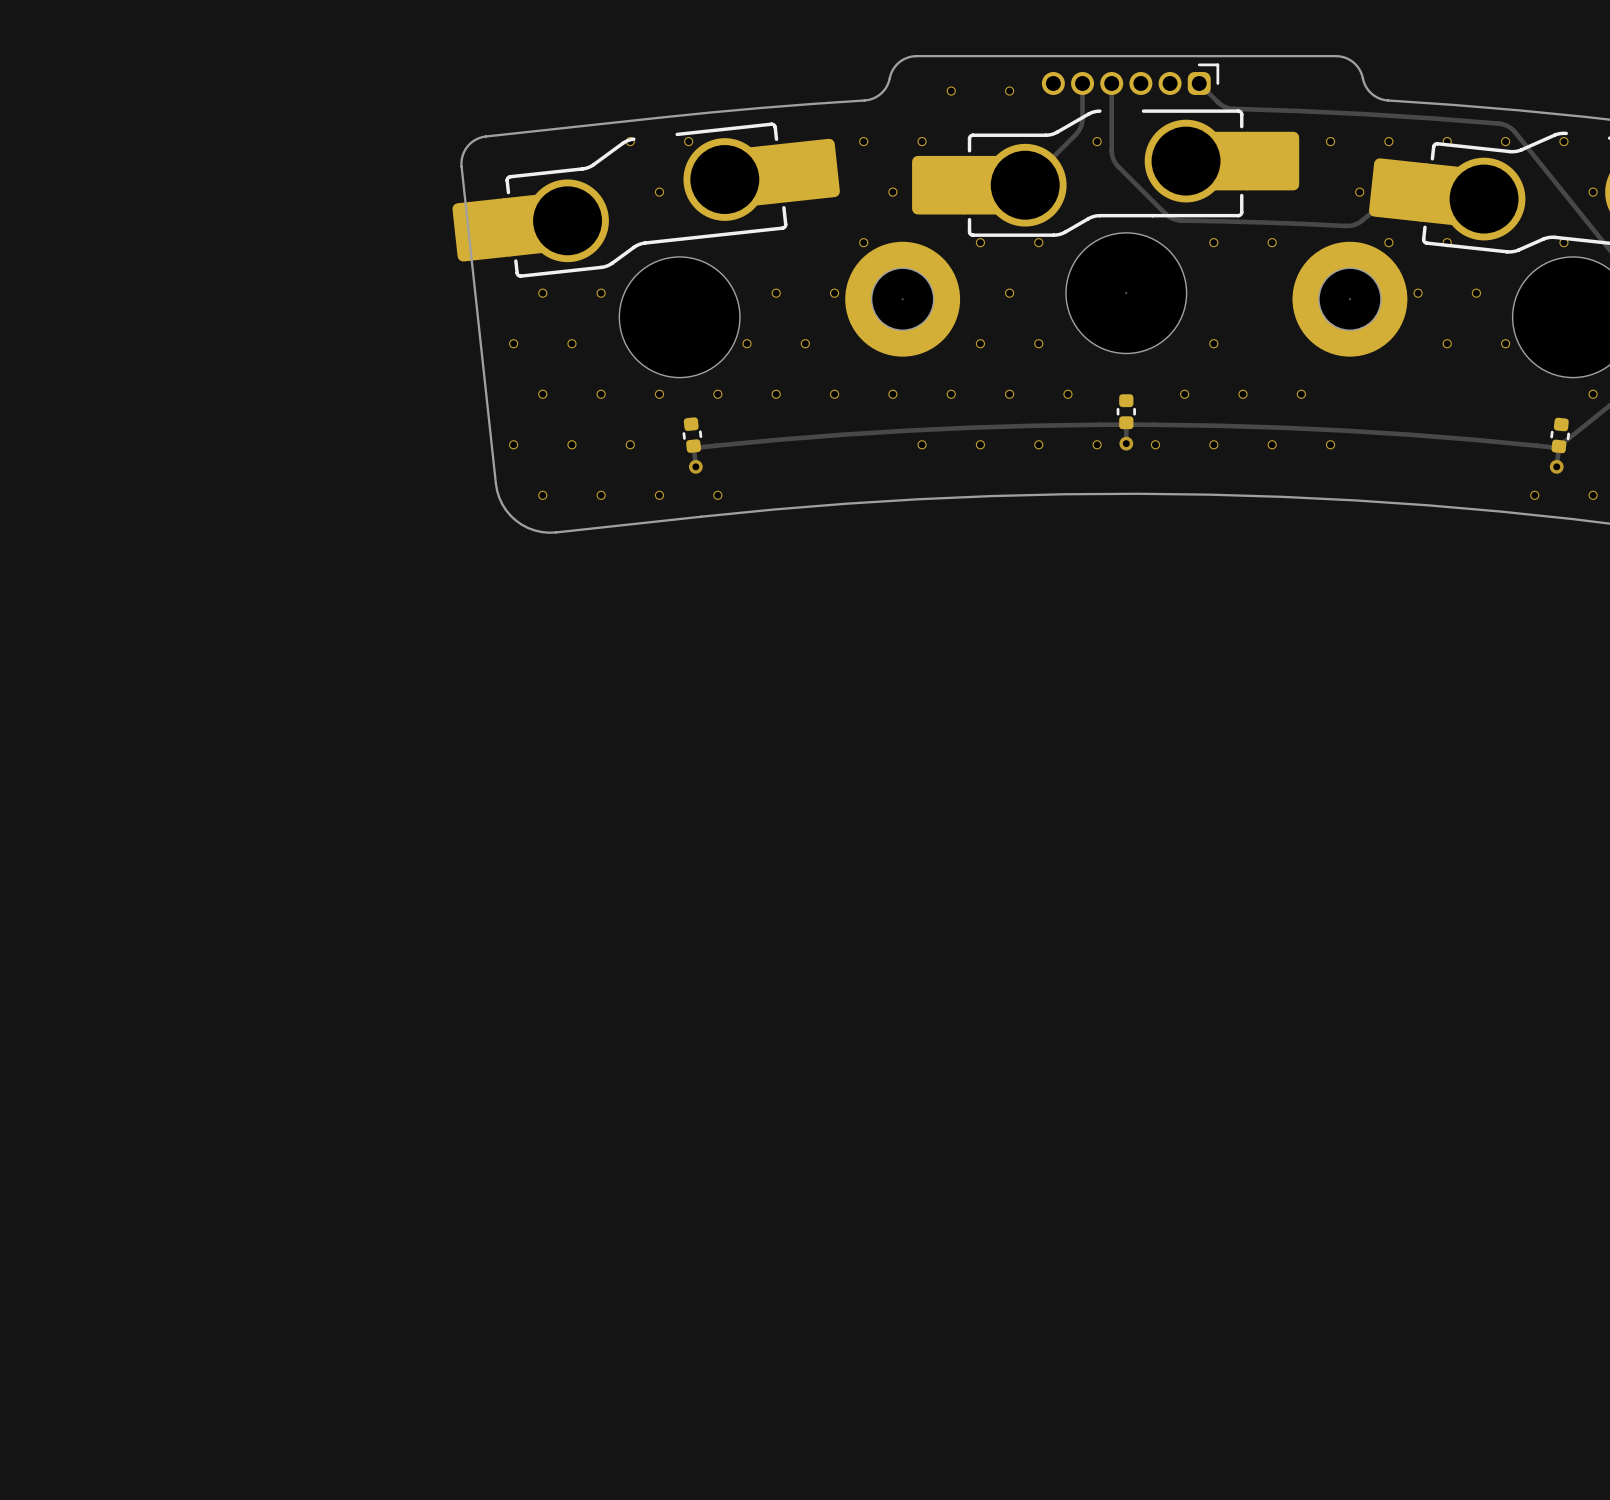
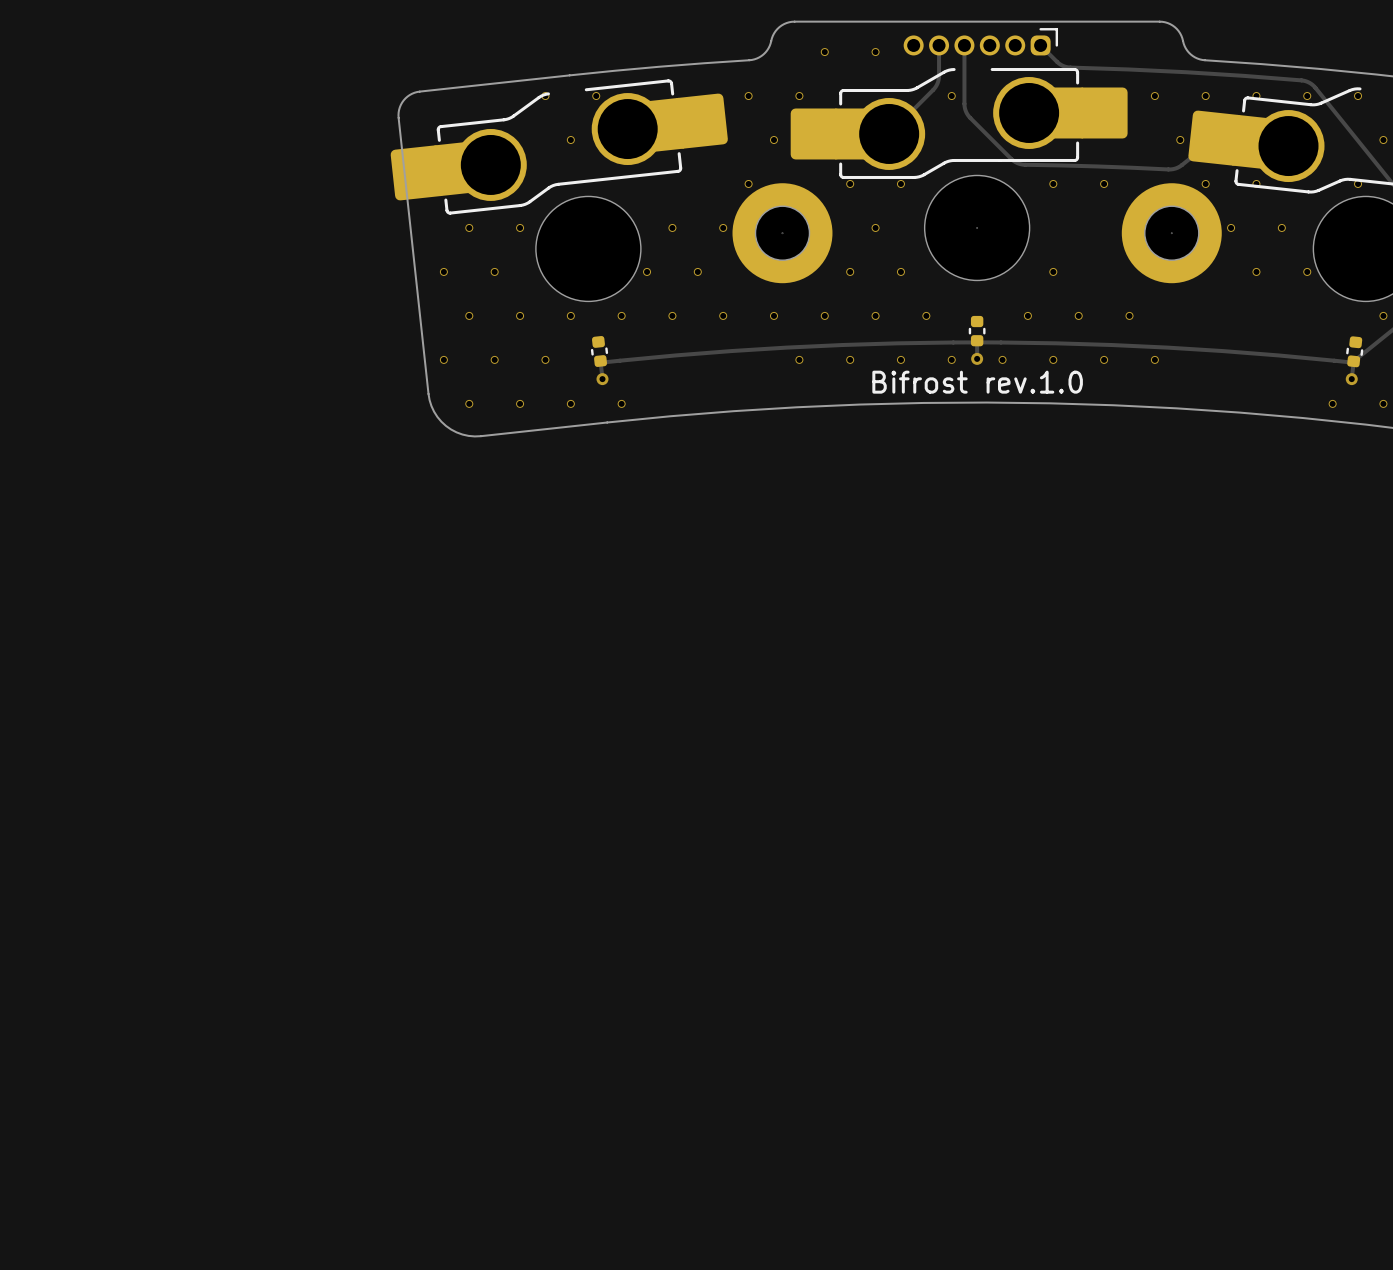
text: none -> Bifrost rev.1.0 (977, 382)

